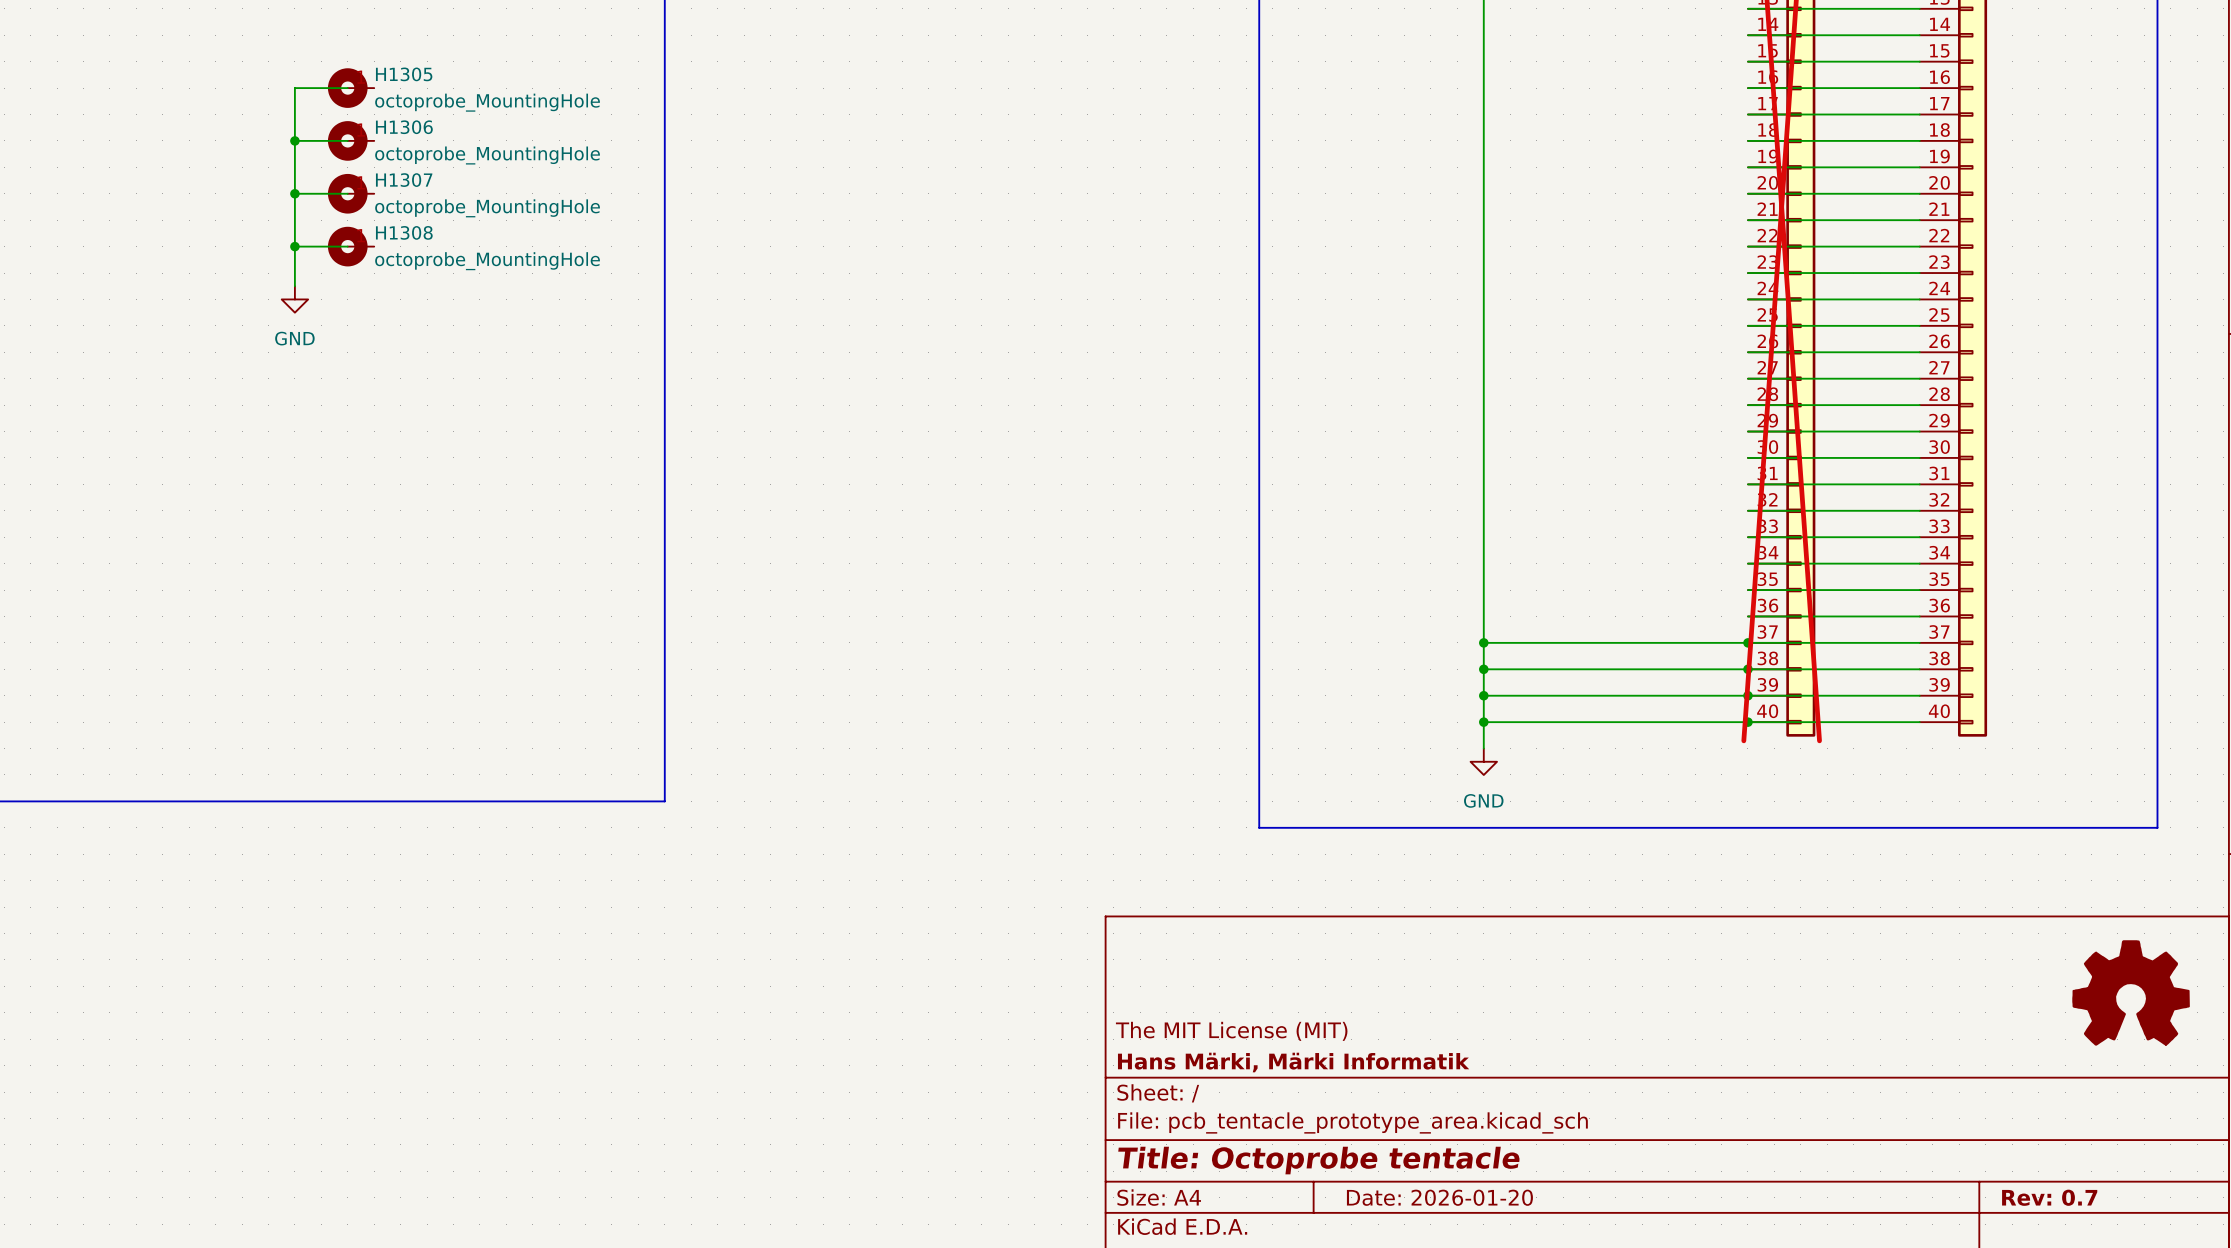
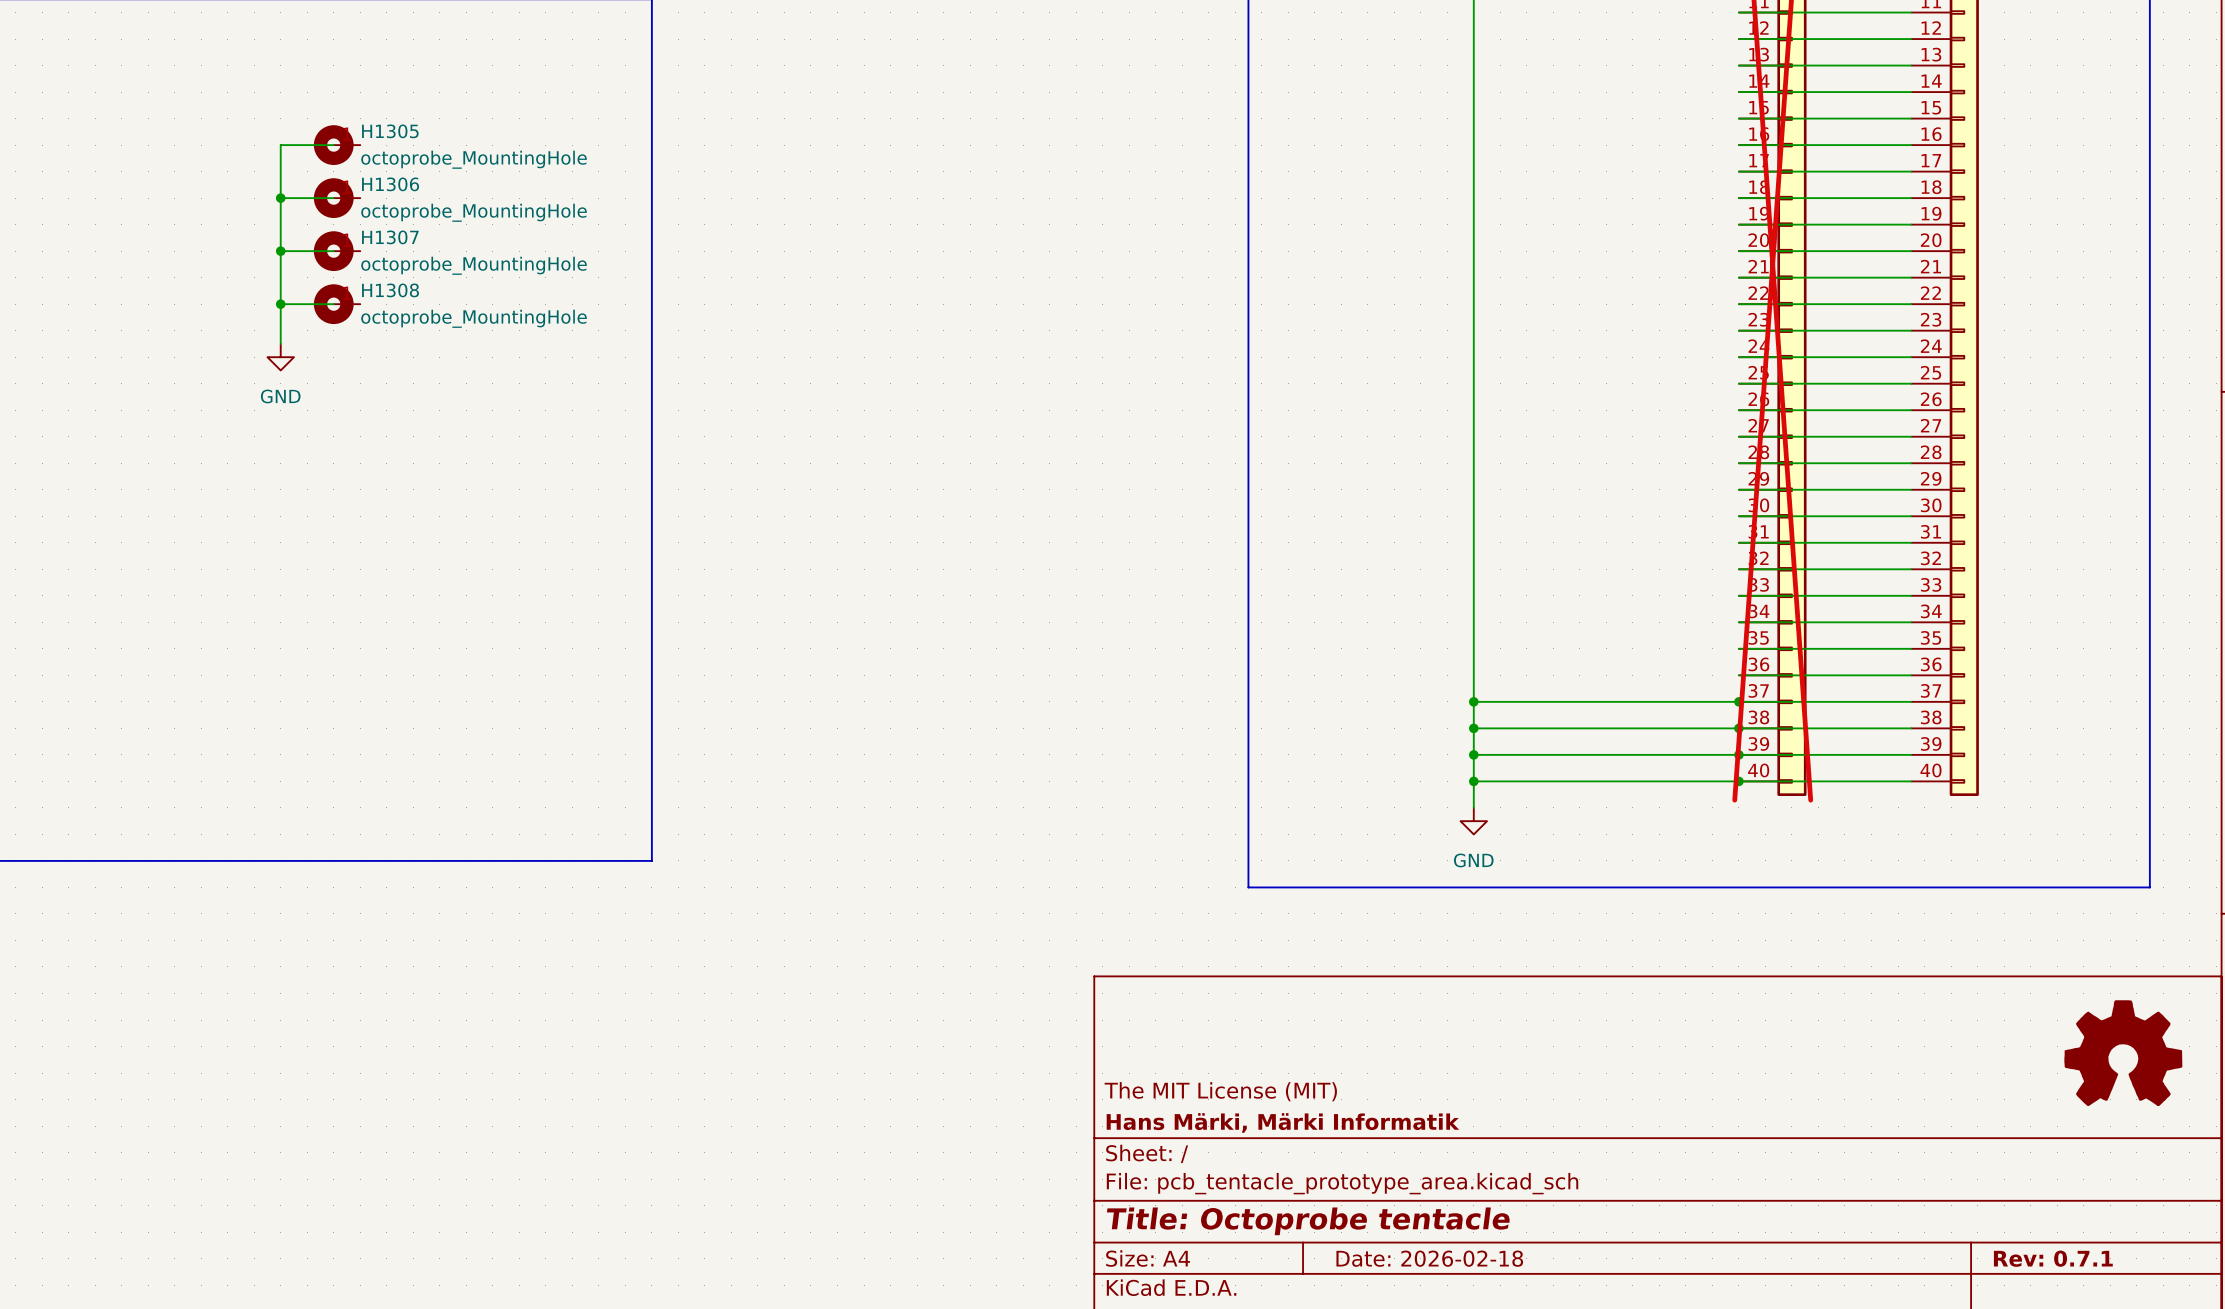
title block: Date: 2026-01-20 (1439, 1197) -> Date: 2026-02-18 (1429, 1258)
title block: Rev: 0.7 (2049, 1197) -> Rev: 0.7.1 (2053, 1258)

